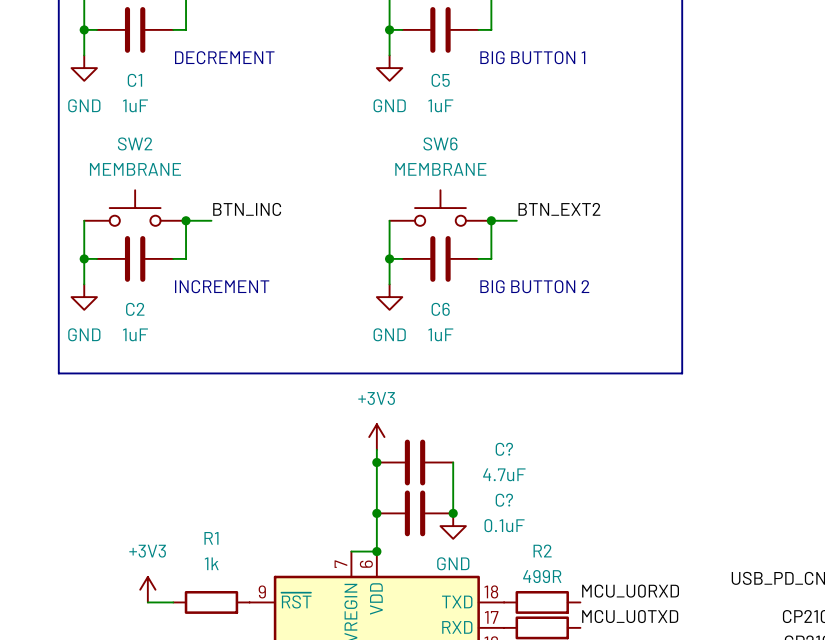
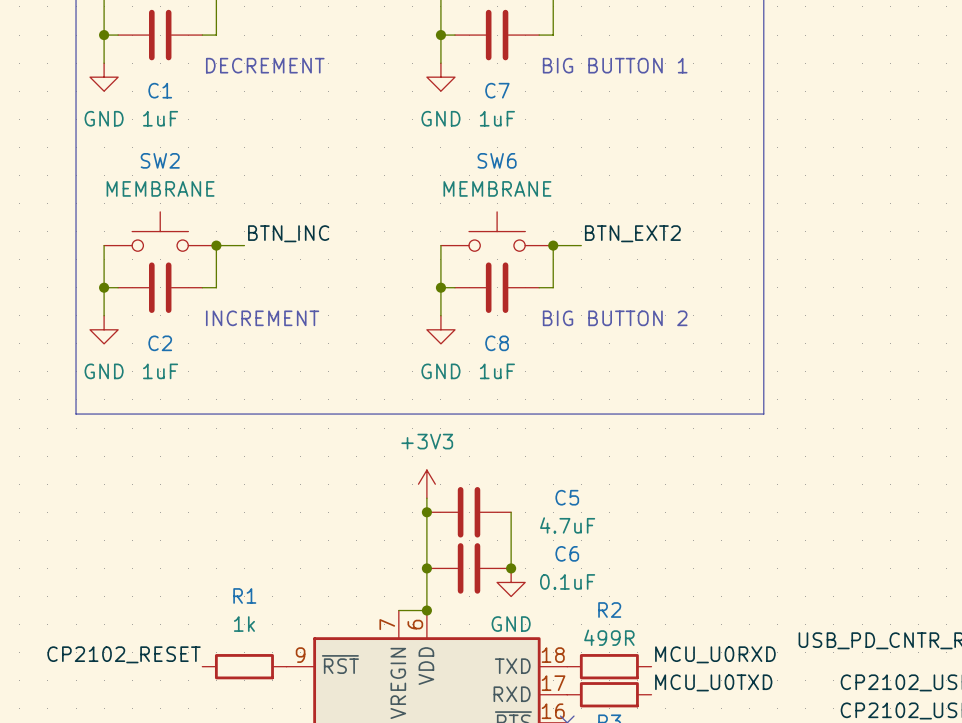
C5 name: C5 (440, 80) -> C7 (497, 90)
C6 name: C6 (440, 309) -> C8 (497, 343)
C? name: C? (504, 449) -> C5 (567, 497)
C? name: C? (504, 500) -> C6 (567, 553)
power symbol: +3V3 (147, 589) -> none
label: none -> CP2102_RESET (124, 654)
wire: (147, 602) (173, 602) -> none

